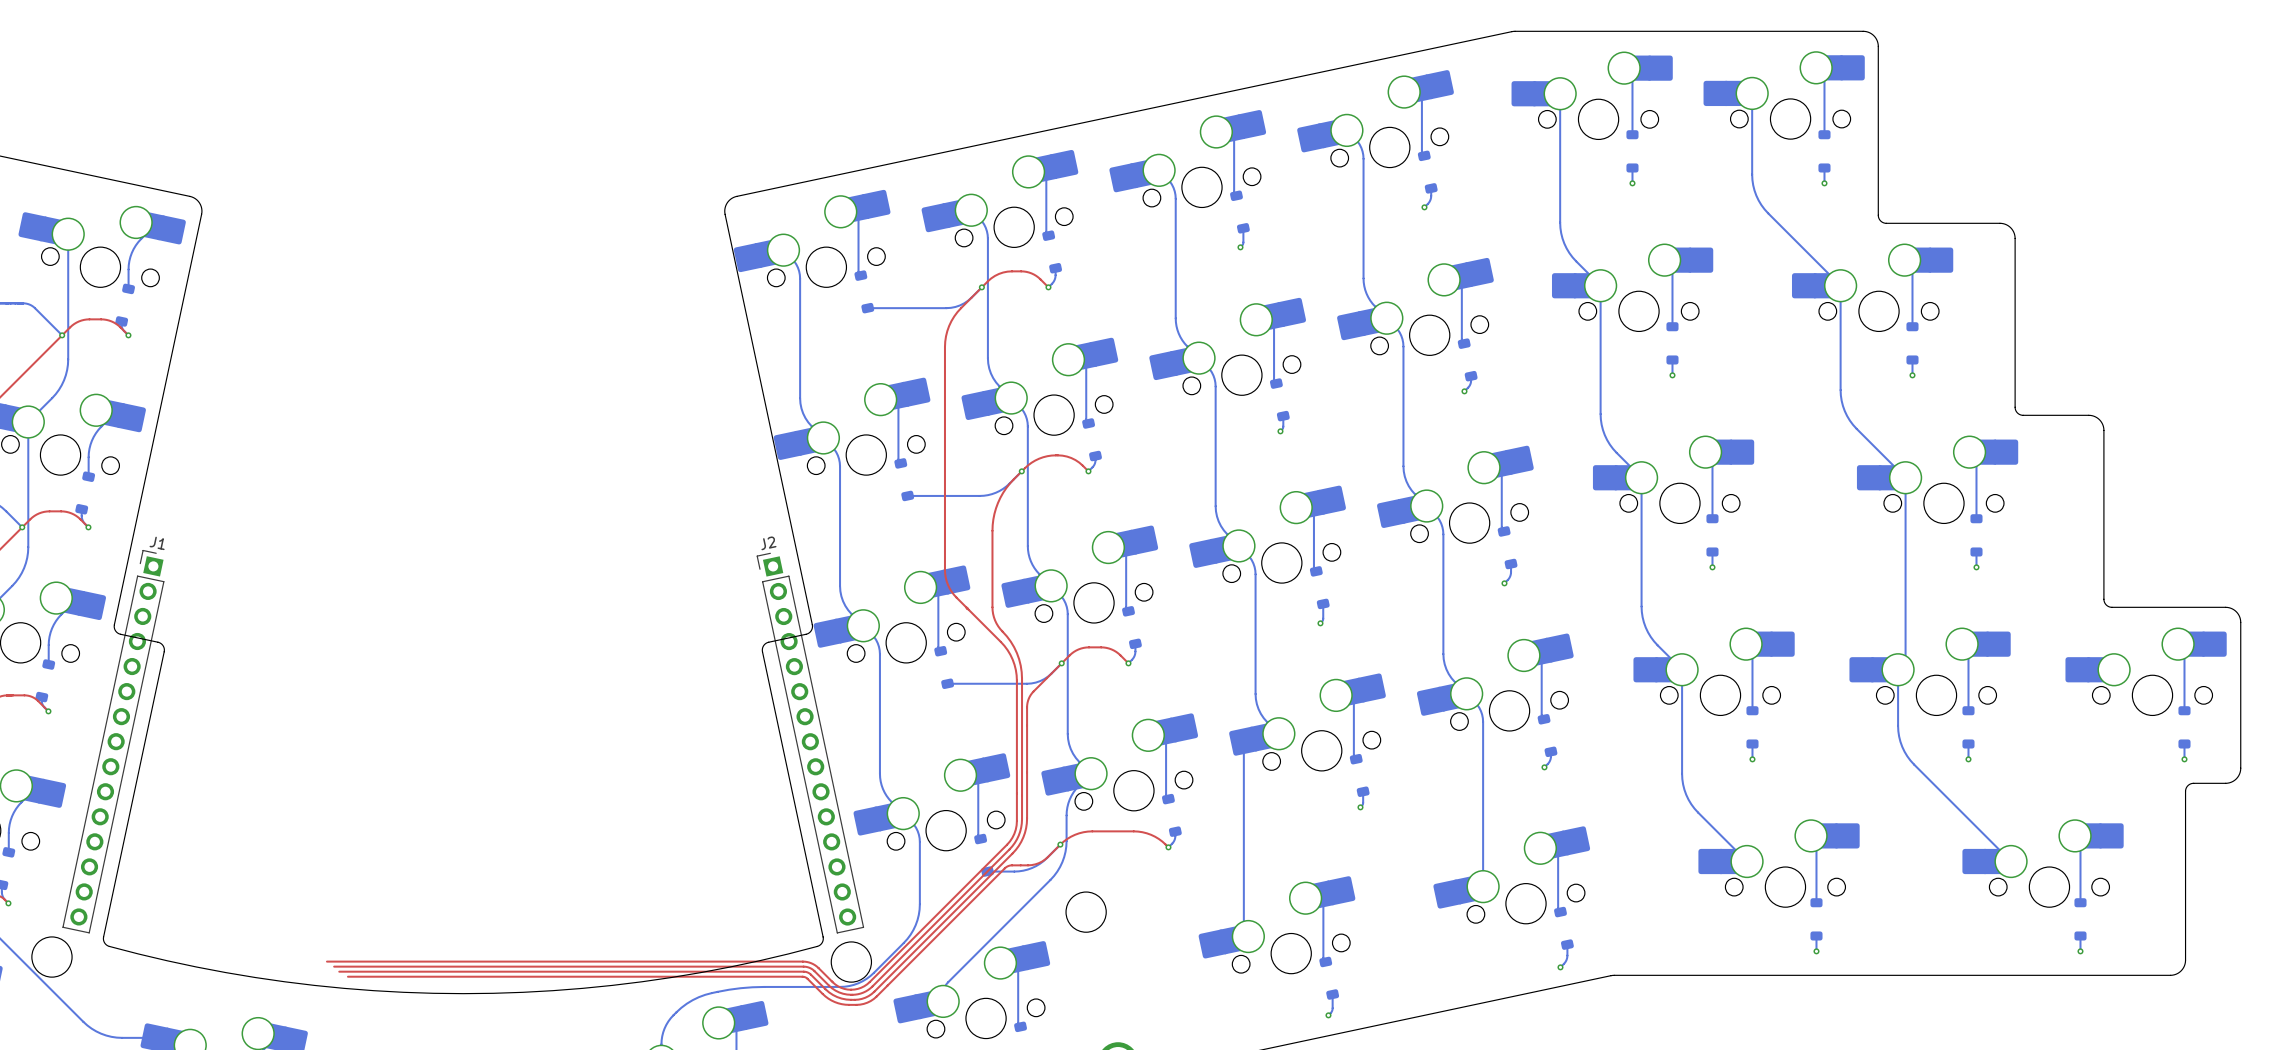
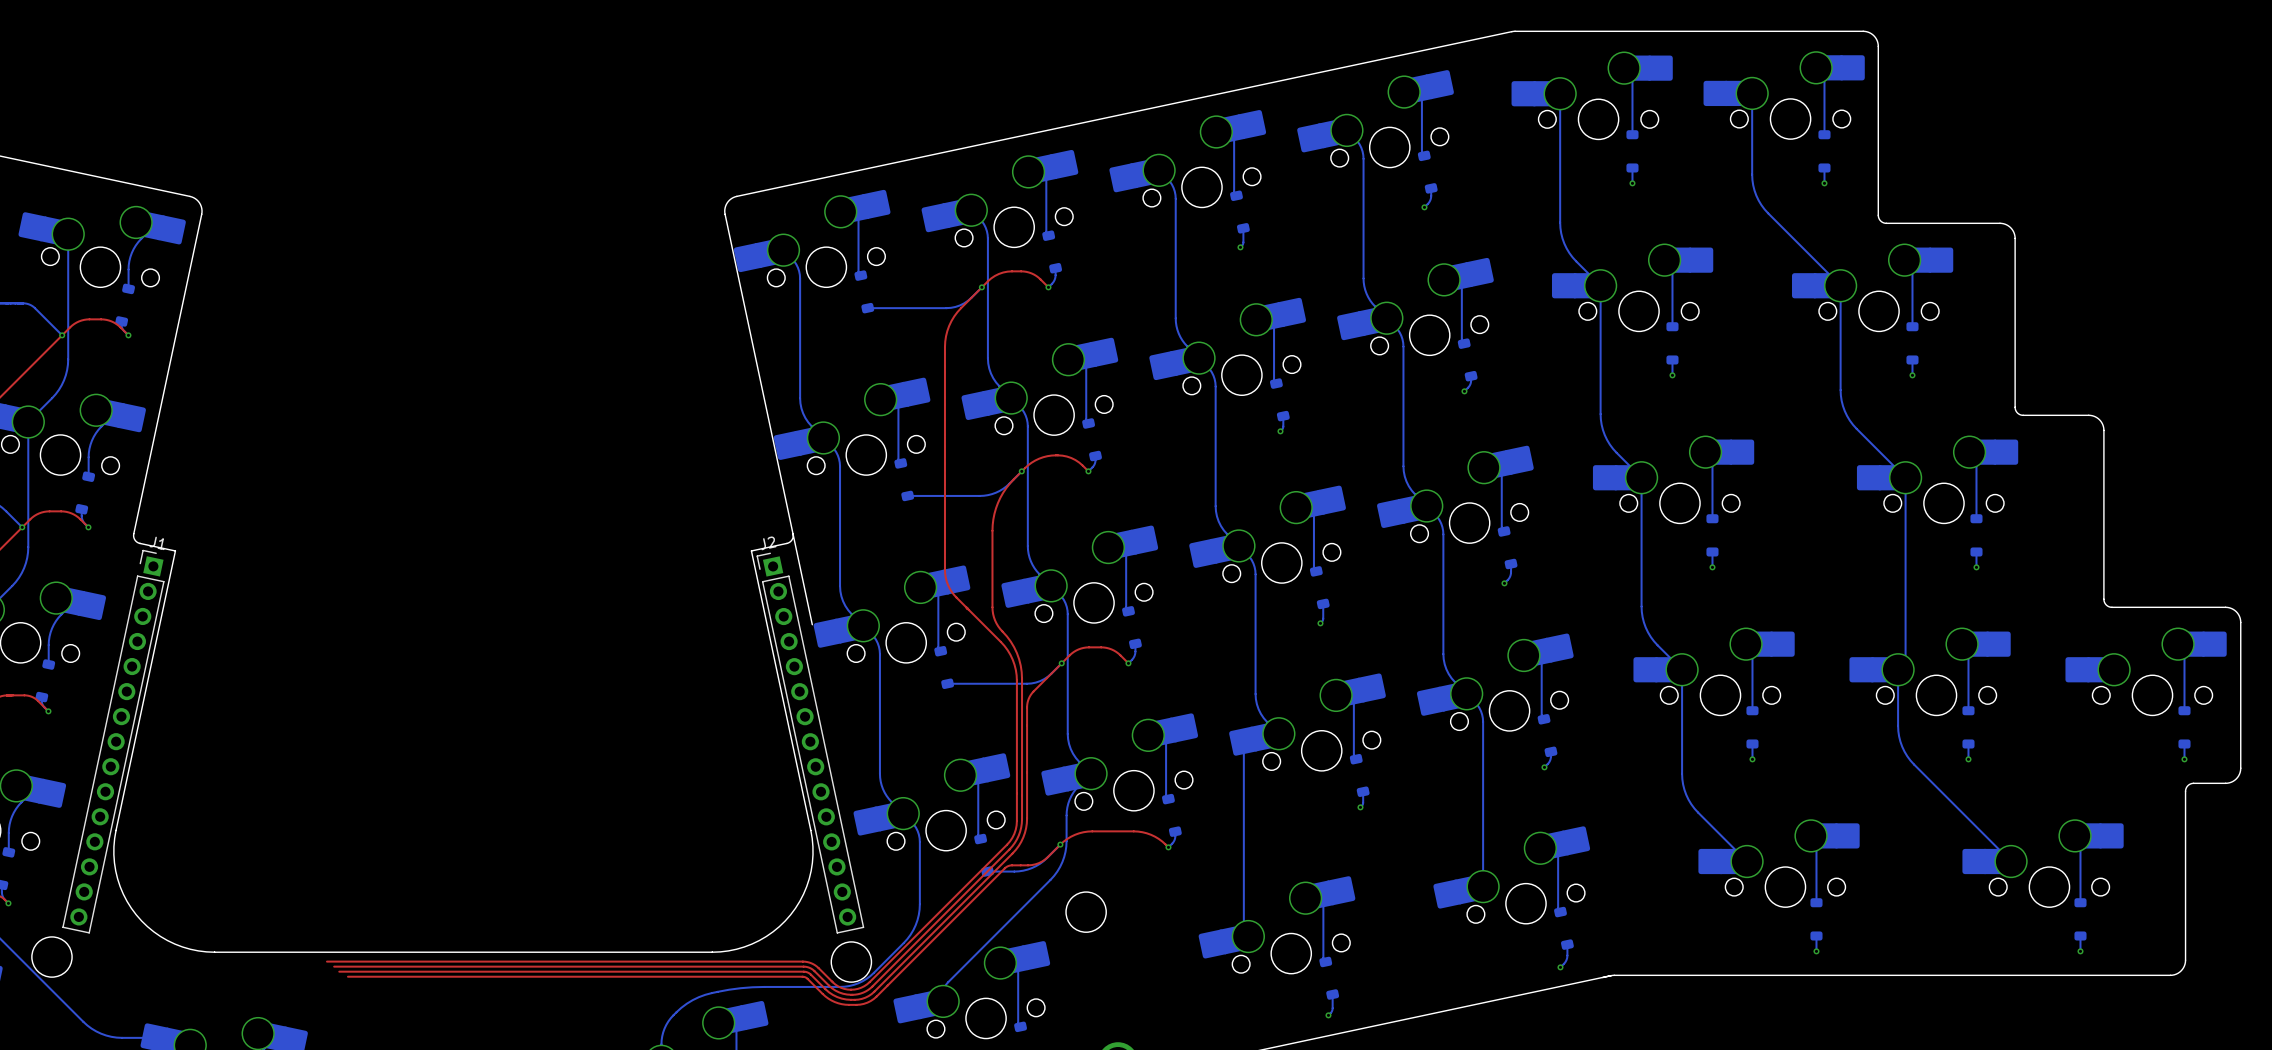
board edge: (189, 196) (199, 202) (201, 214) (114, 625) (118, 633) (159, 642) (163, 645) (164, 650) (103, 936) (106, 945) (196, 967) (284, 981) (373, 990) (463, 993) (552, 990) (641, 981) (730, 967) (818, 946) (822, 942) (823, 936) (762, 650) (763, 645) (767, 642) (808, 633) (811, 629) (812, 624) -> (189, 196) (199, 202) (201, 214) (133, 535) (139, 543) (175, 550) (113, 846) (117, 878) (127, 901) (141, 920) (167, 940) (190, 949) (214, 952) (712, 952) (744, 946) (766, 936) (785, 920) (799, 901) (809, 878) (812, 854) (810, 830) (751, 550) (787, 543) (791, 539) (793, 533)

